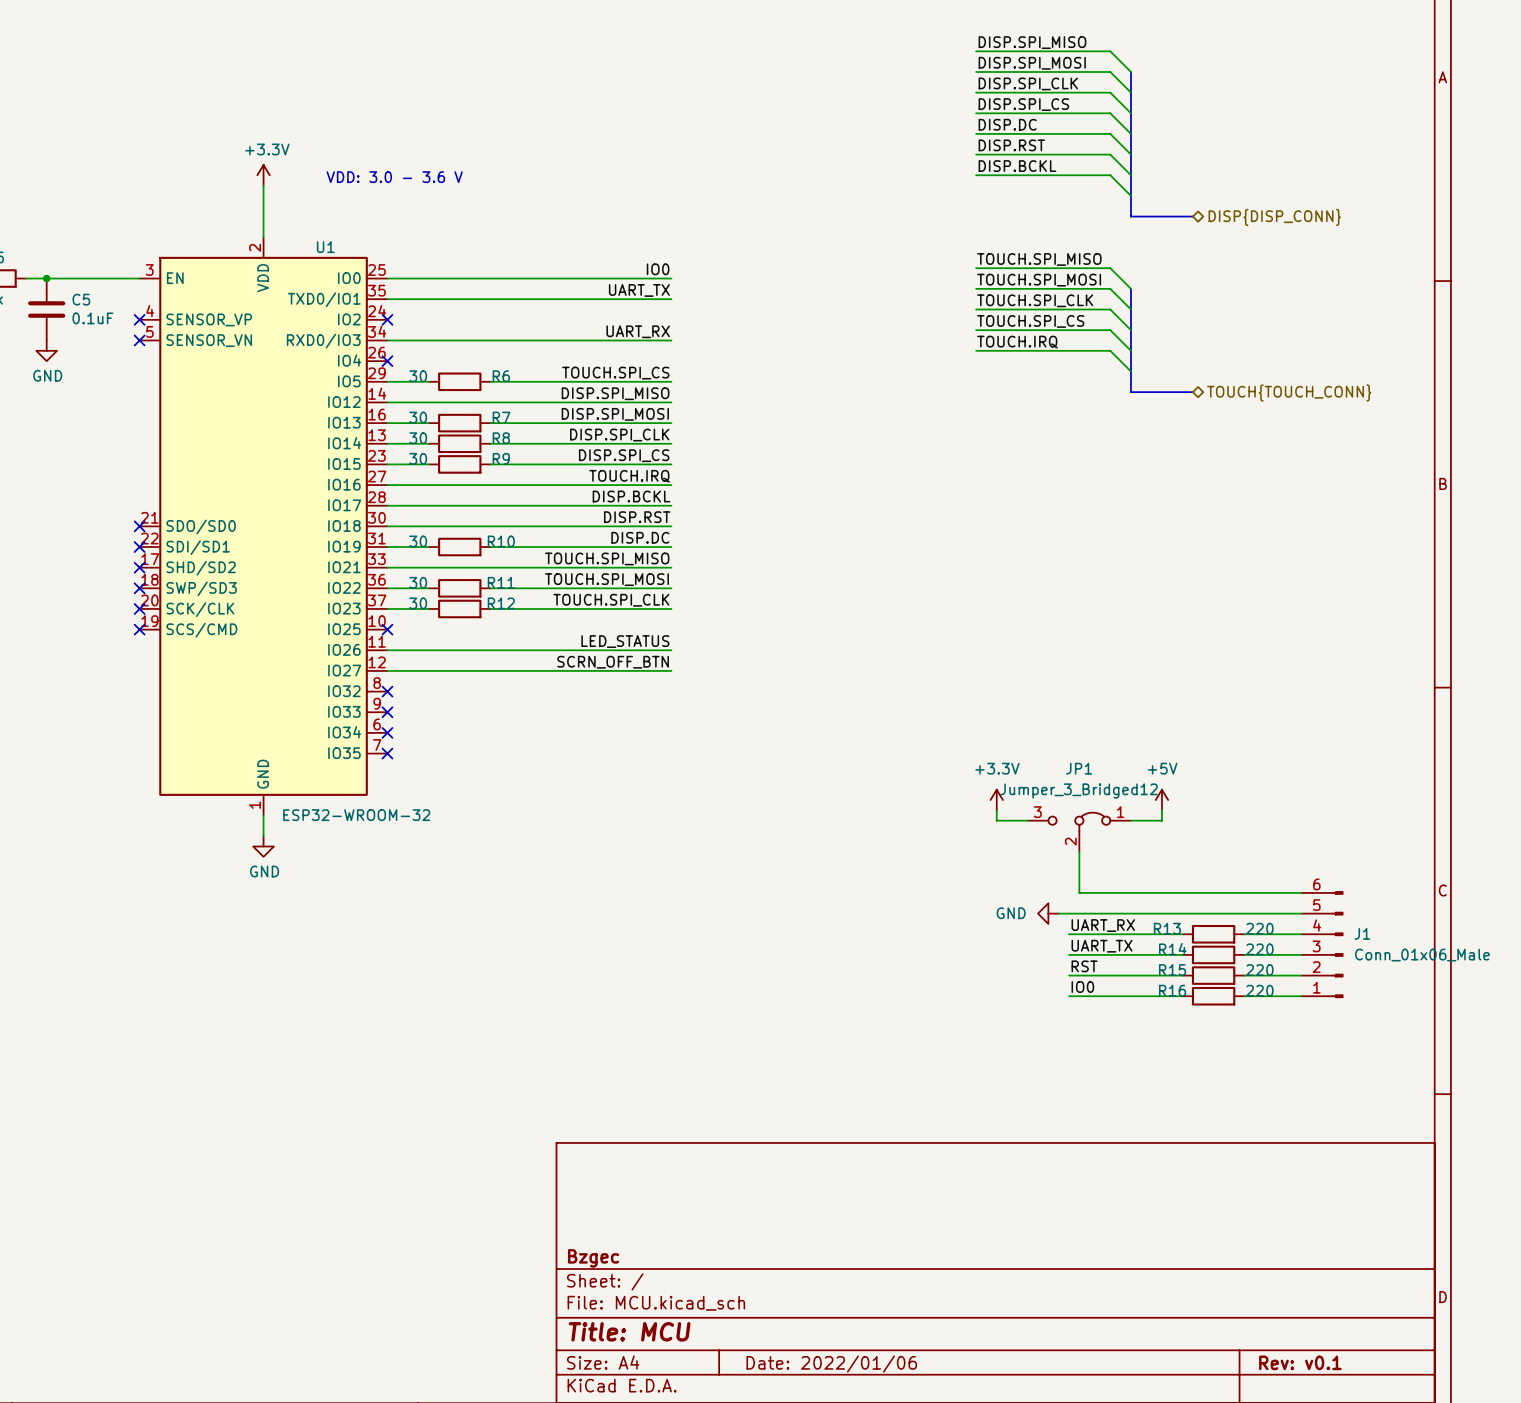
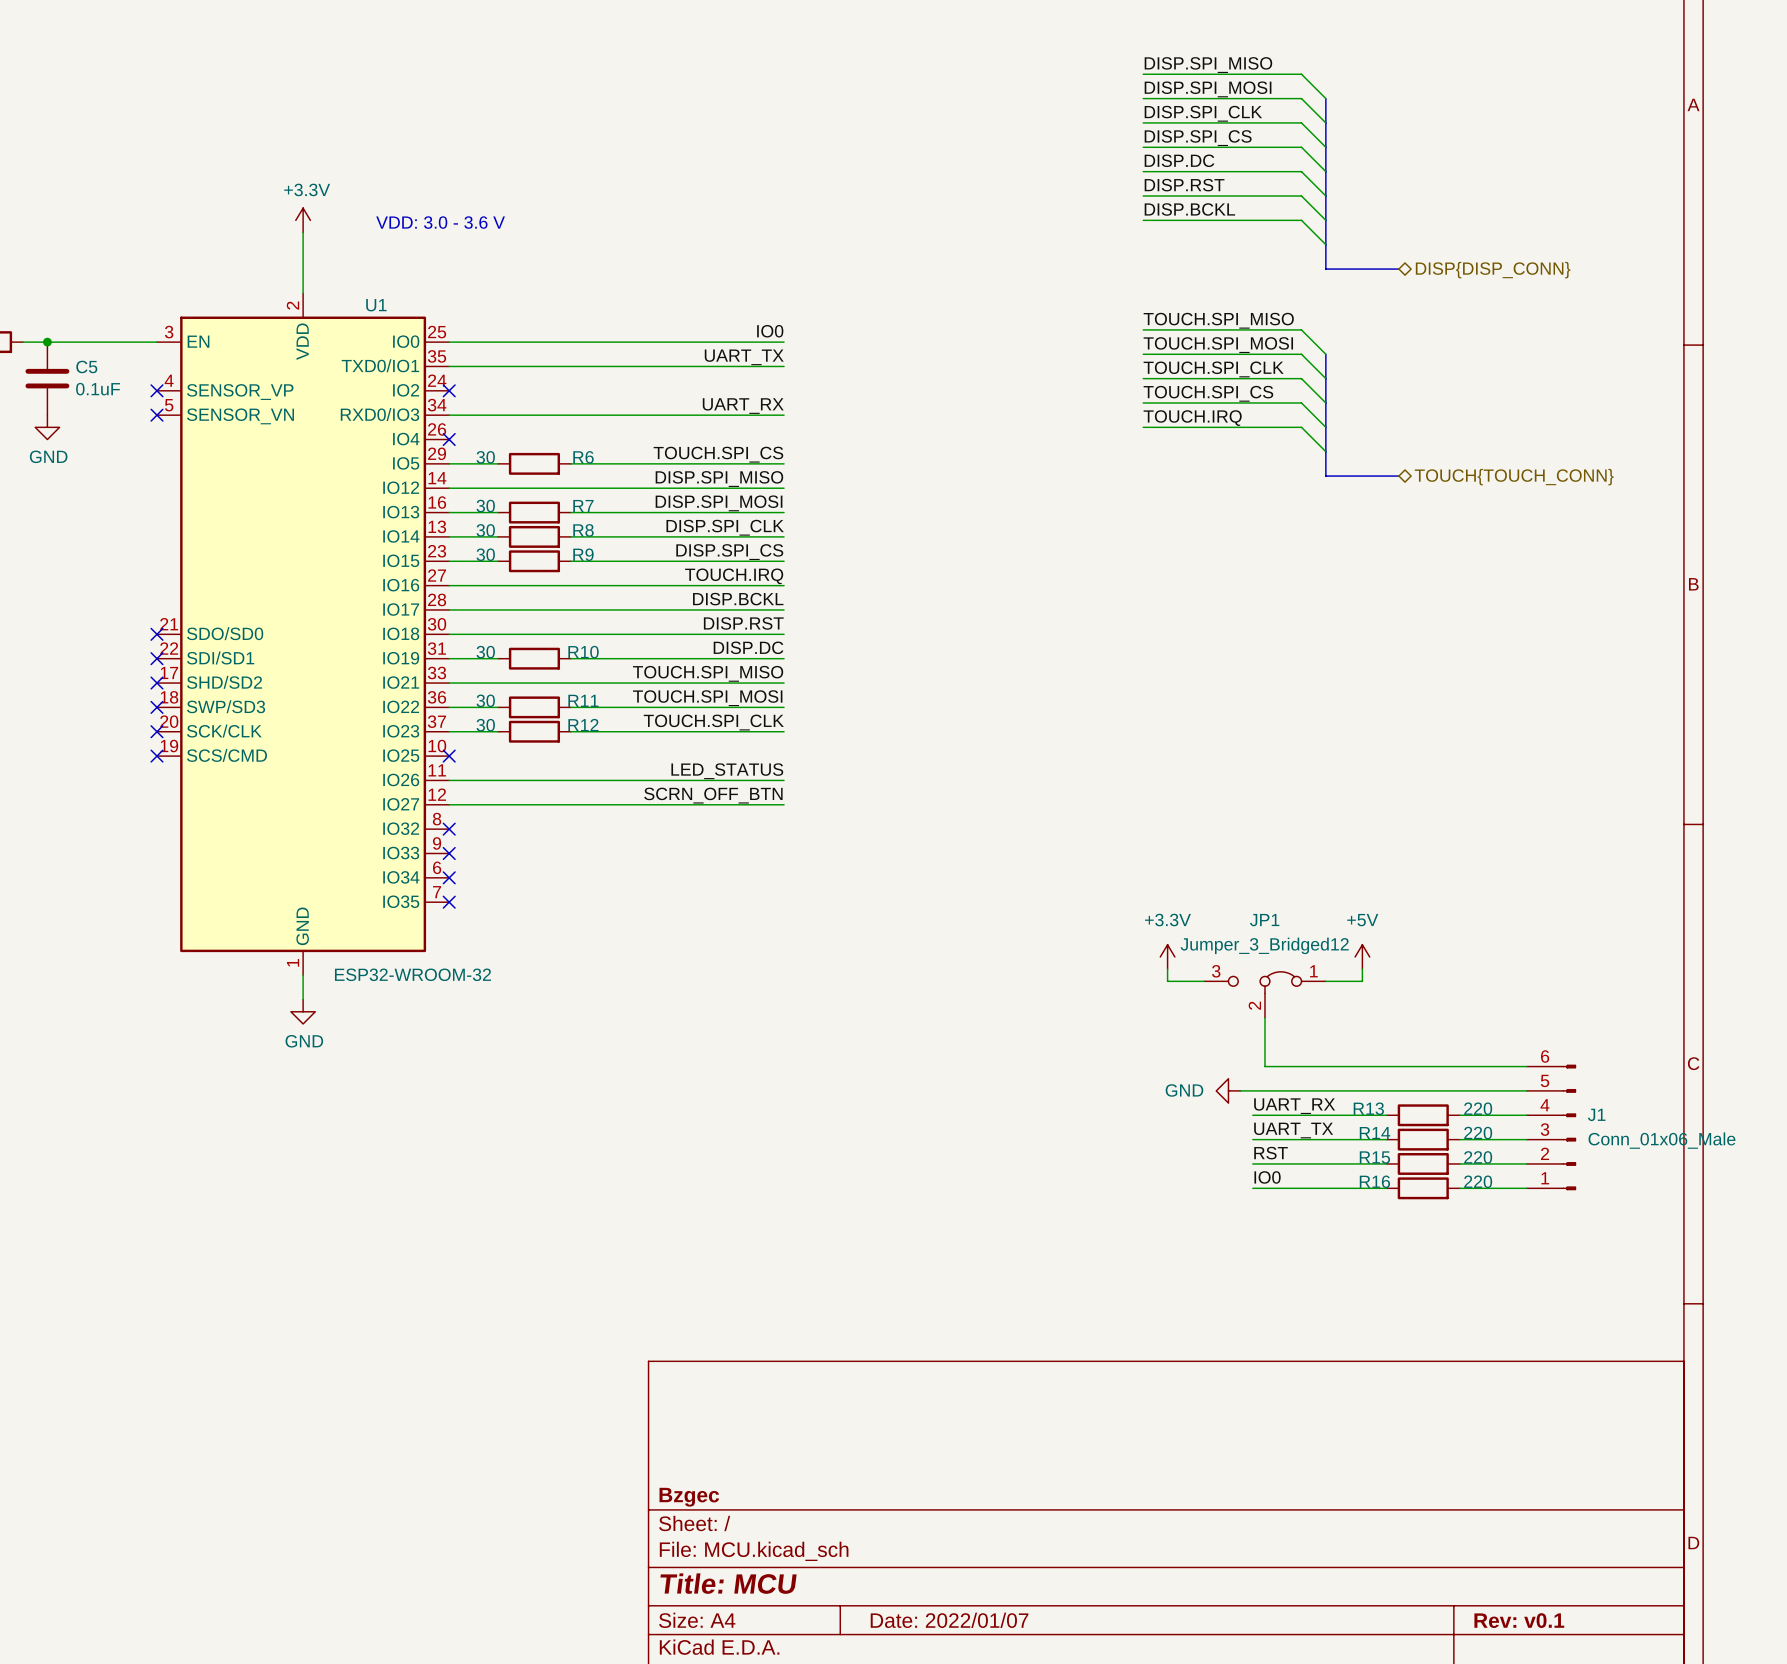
title block: Date: 2022/01/06 (831, 1364) -> Date: 2022/01/07 (949, 1620)

